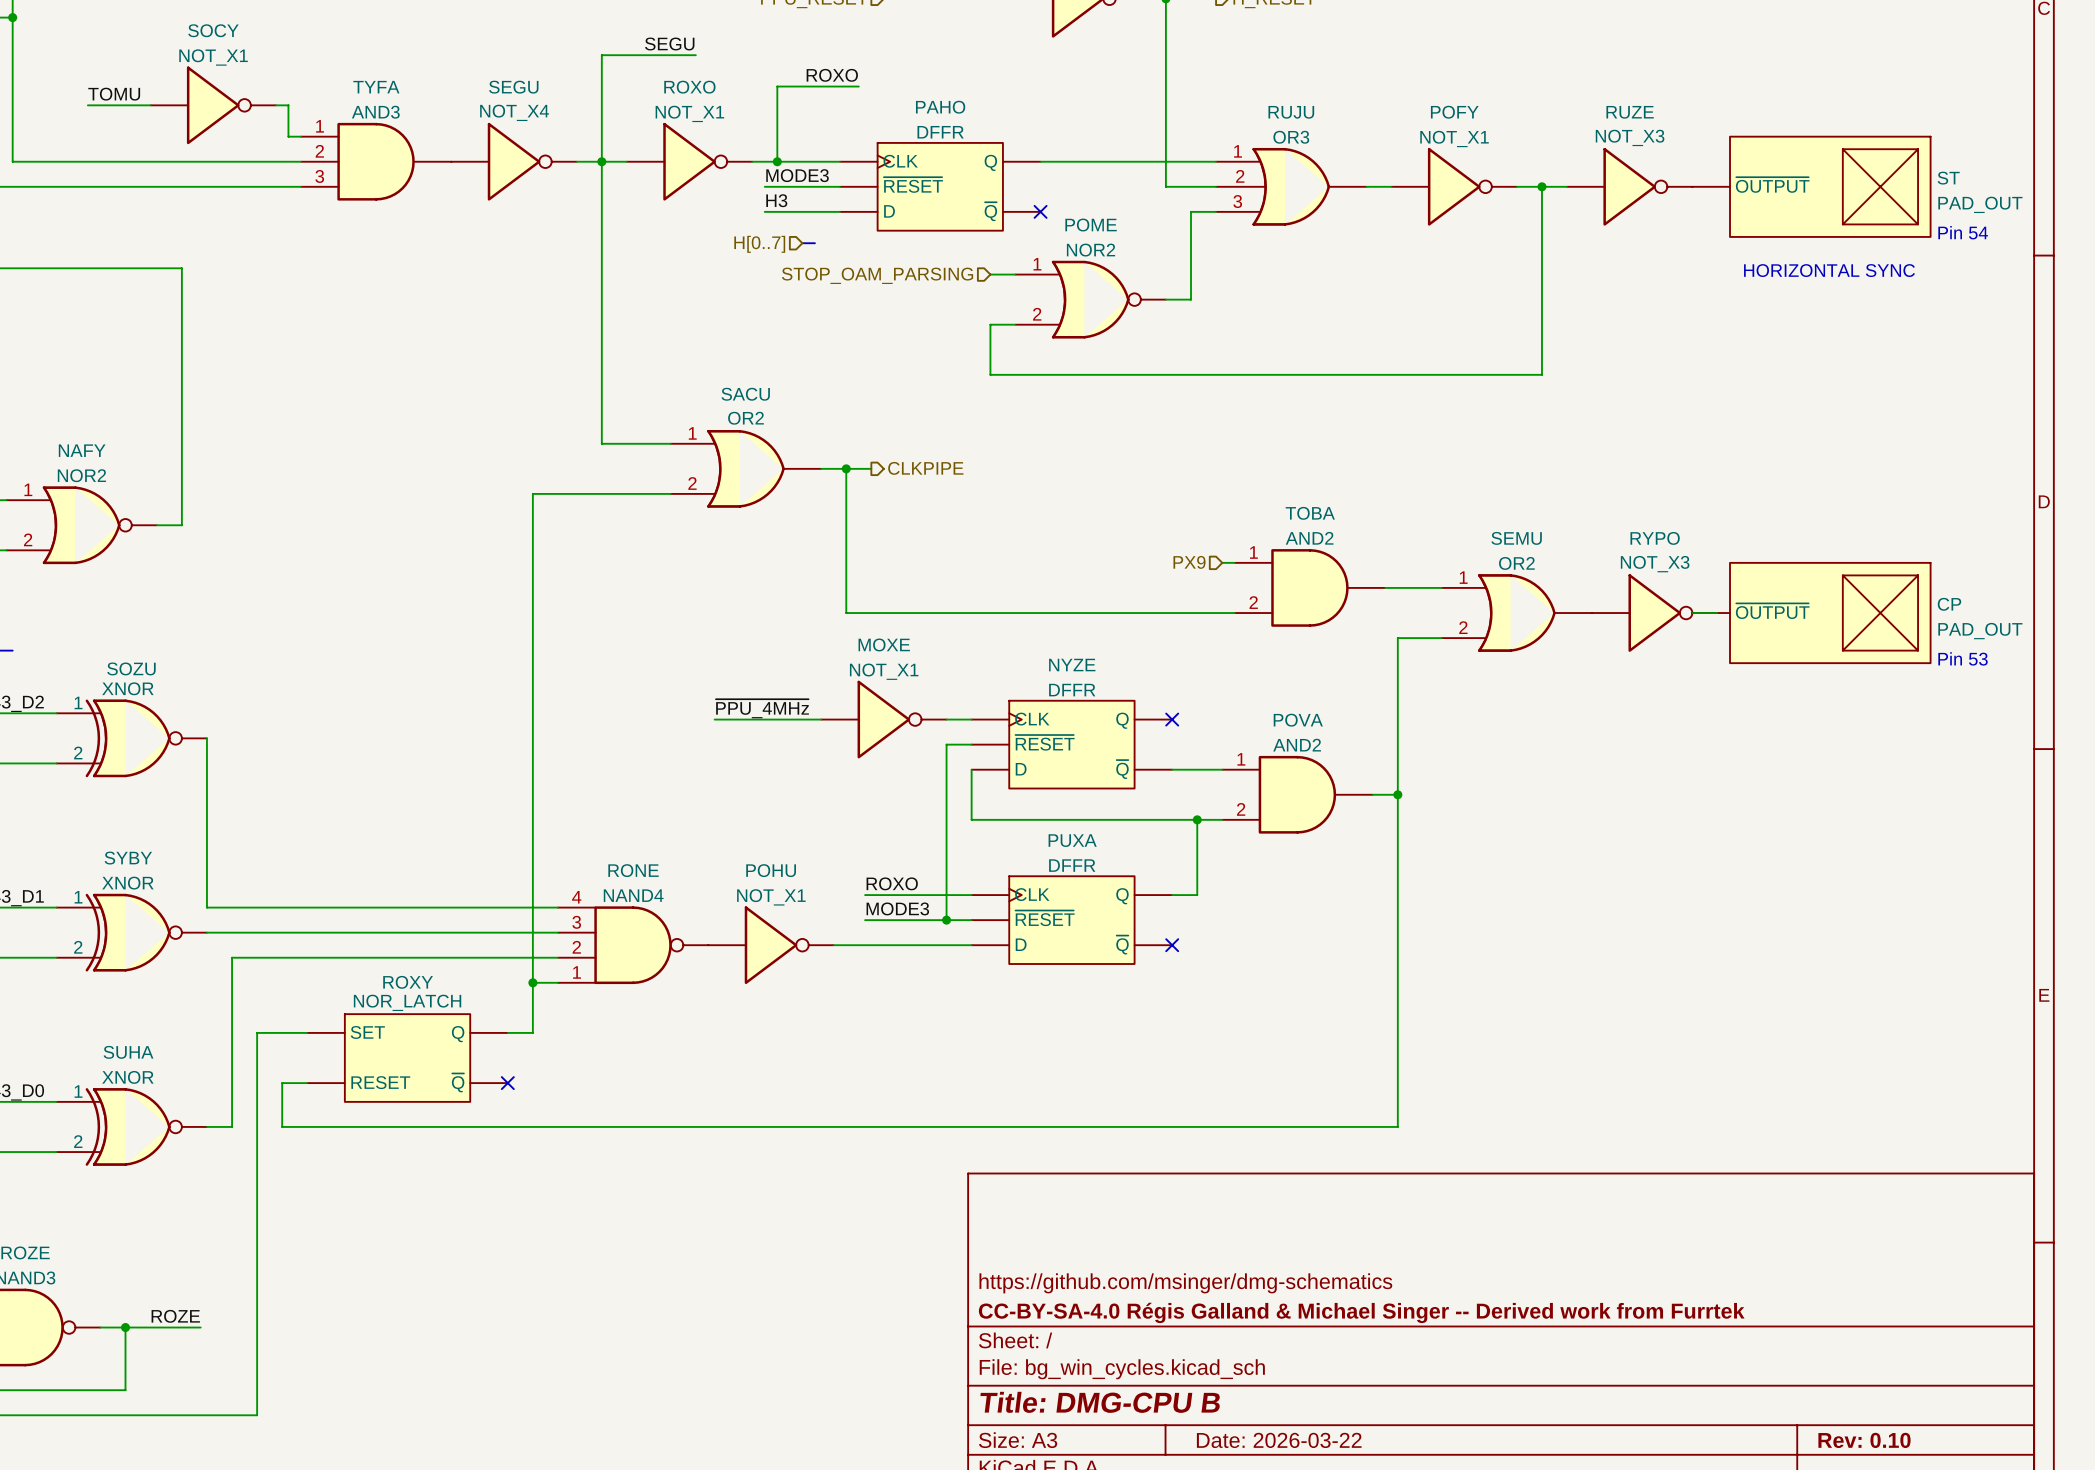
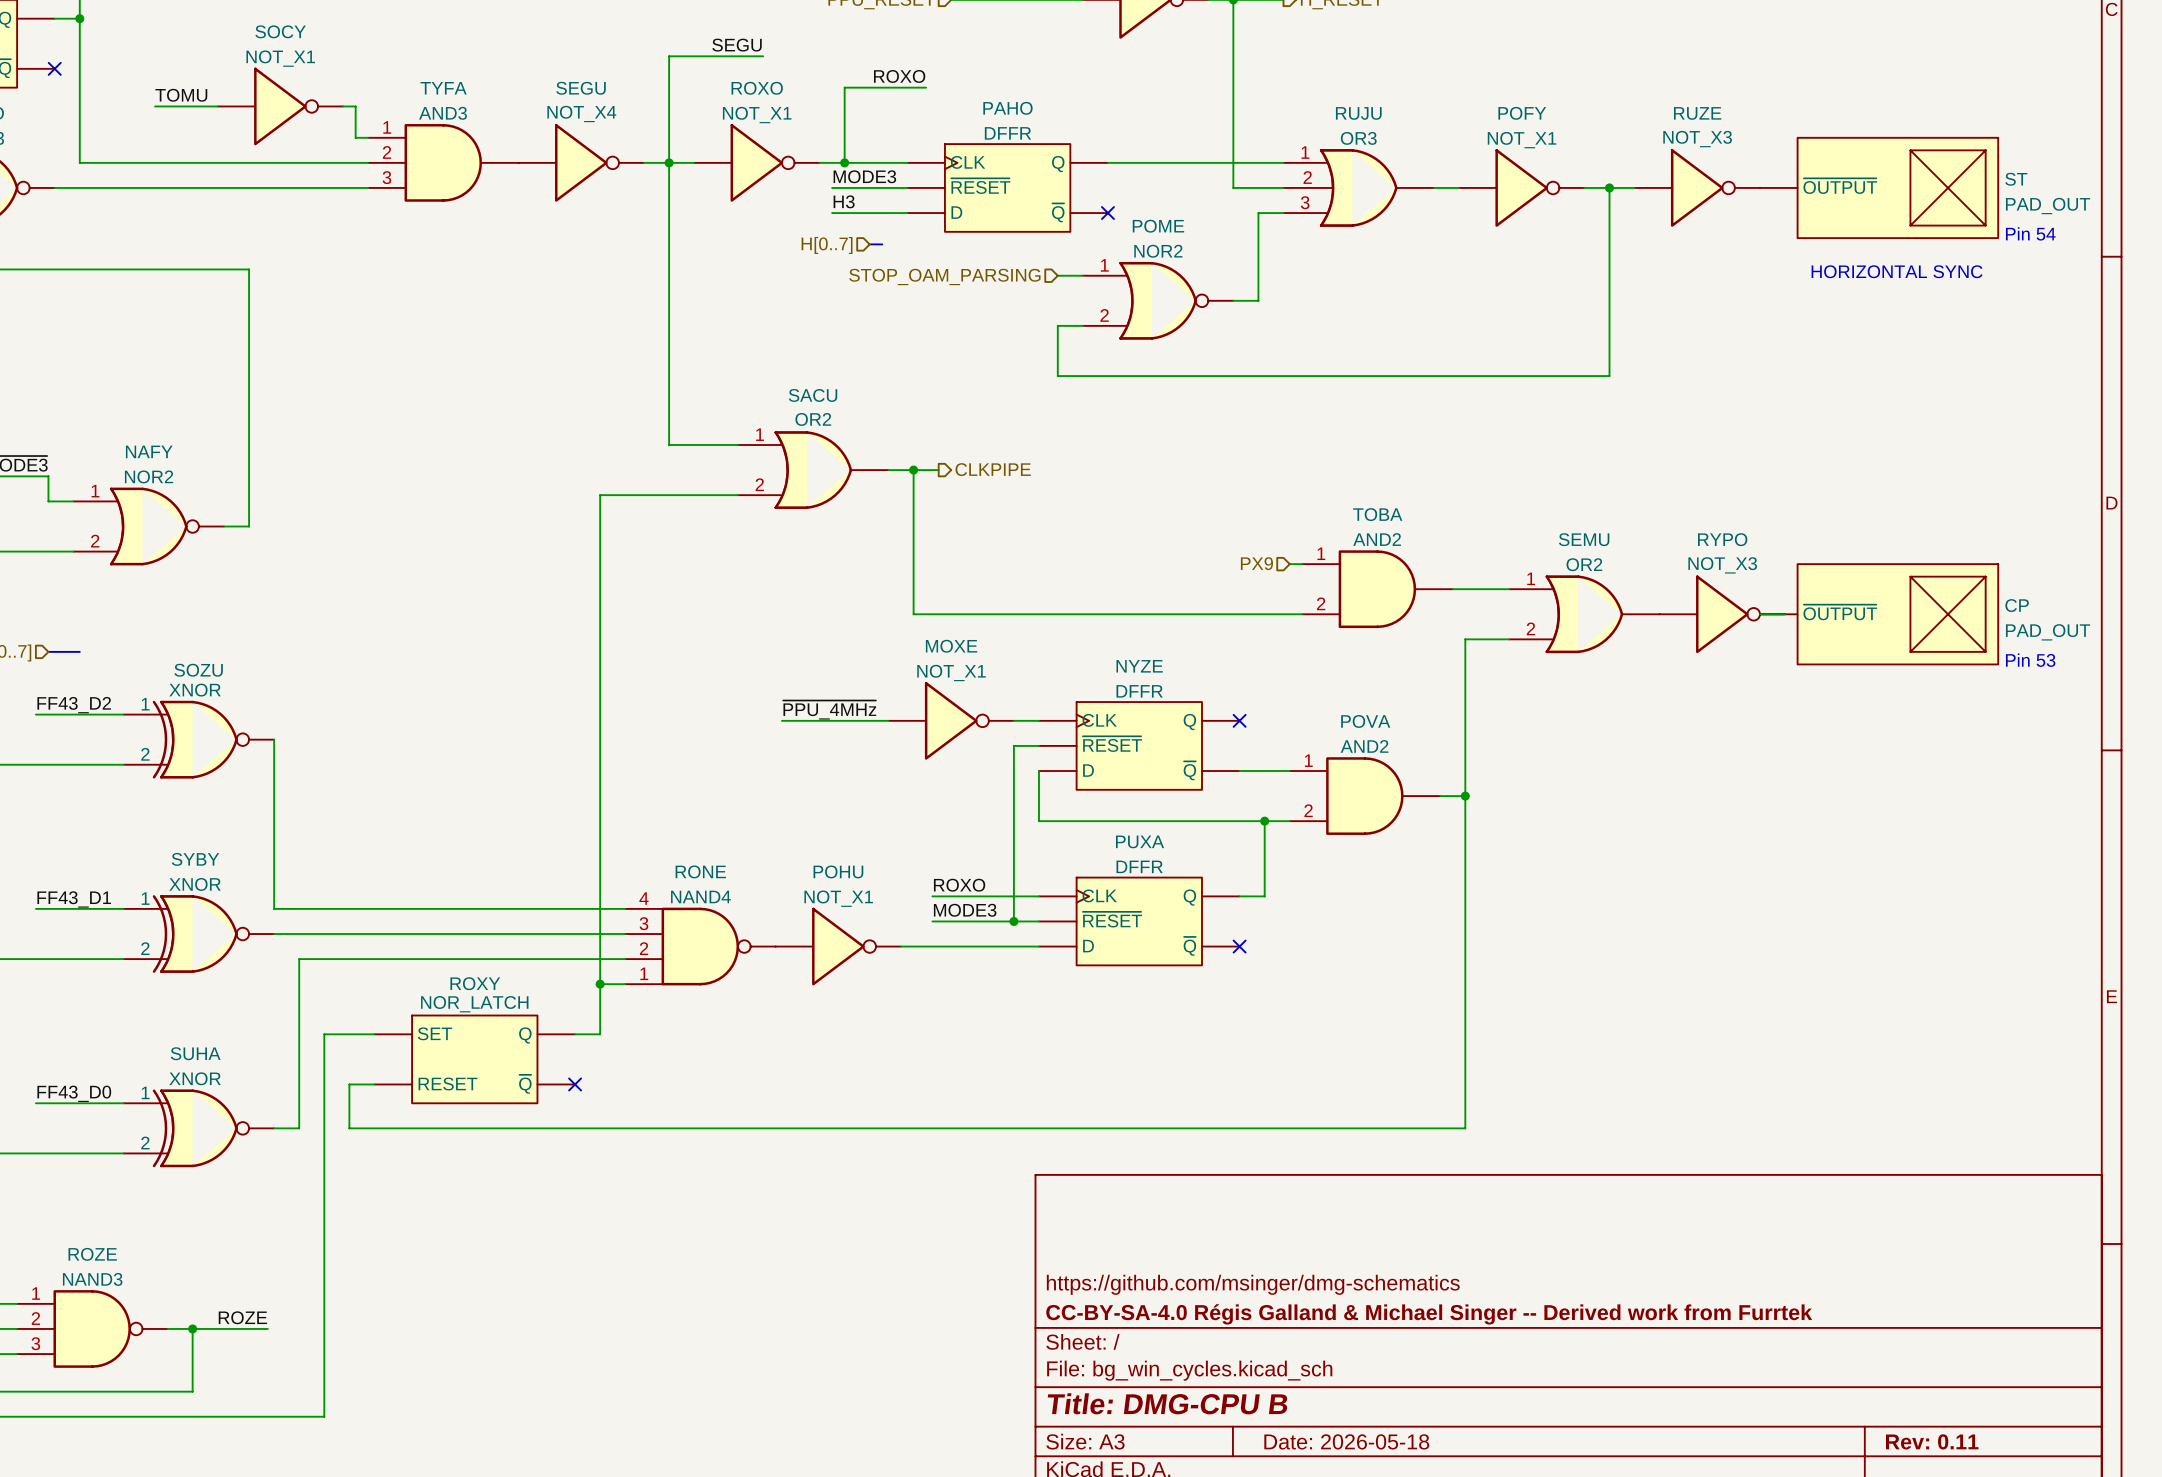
title block: Date: 2026-03-22 (1279, 1440) -> Date: 2026-05-18 (1346, 1441)
title block: Rev: 0.10 (1864, 1440) -> Rev: 0.11 (1932, 1441)

